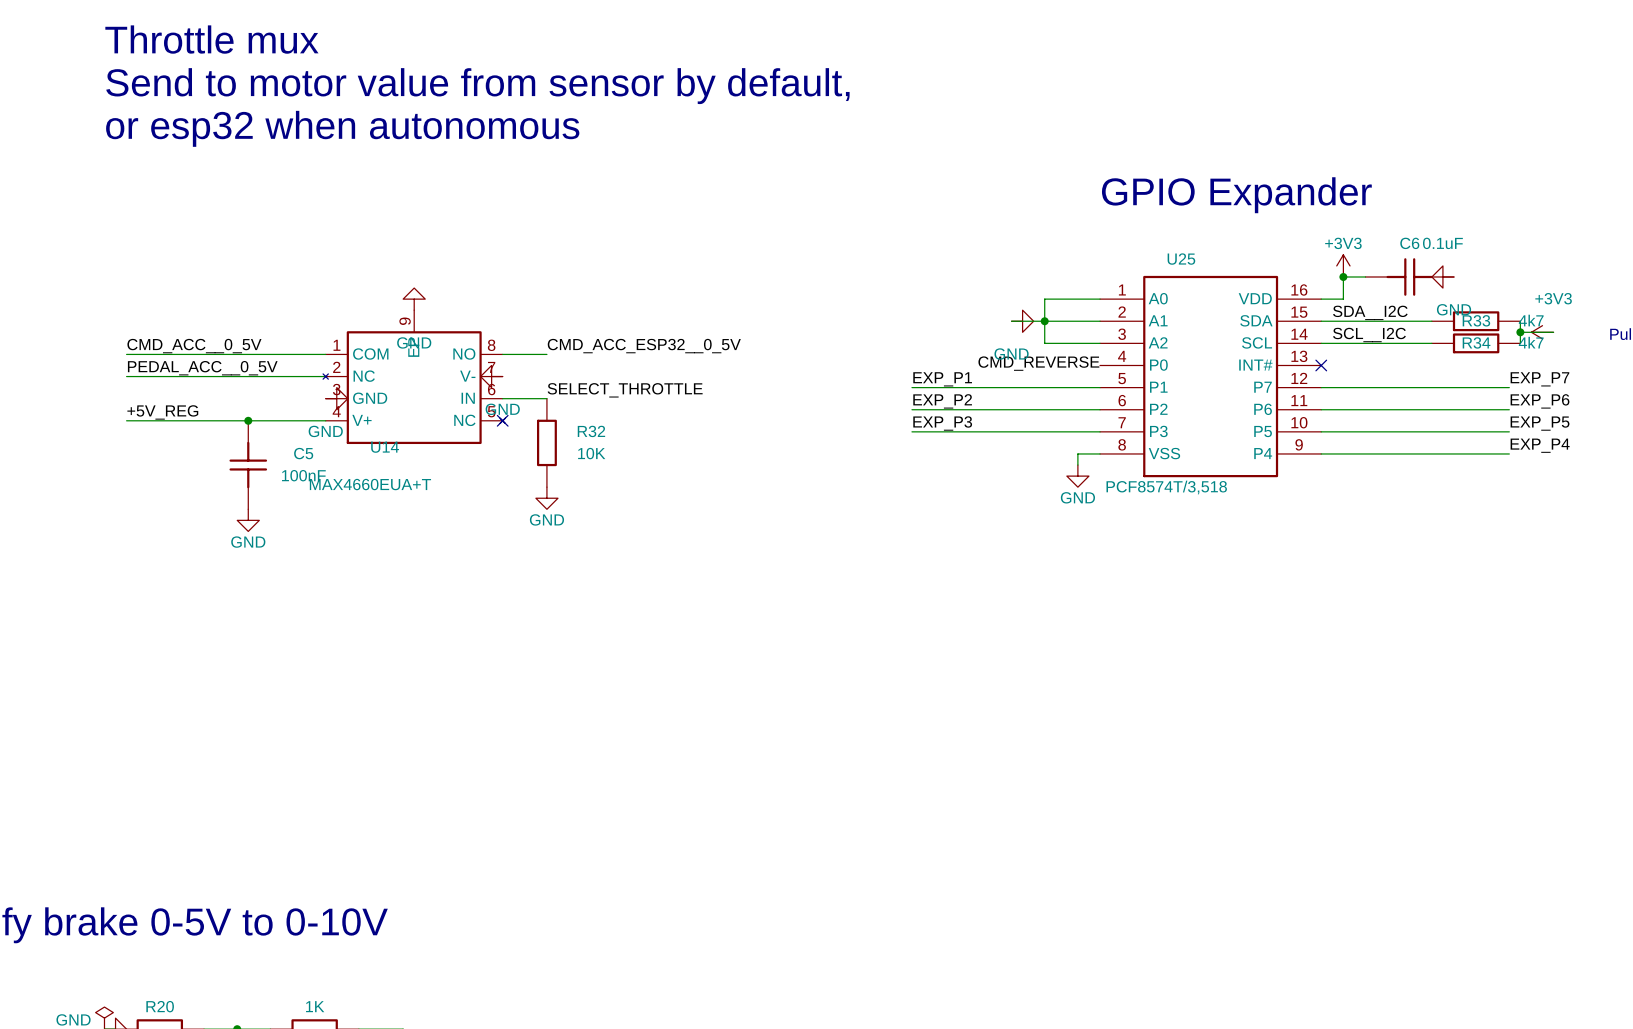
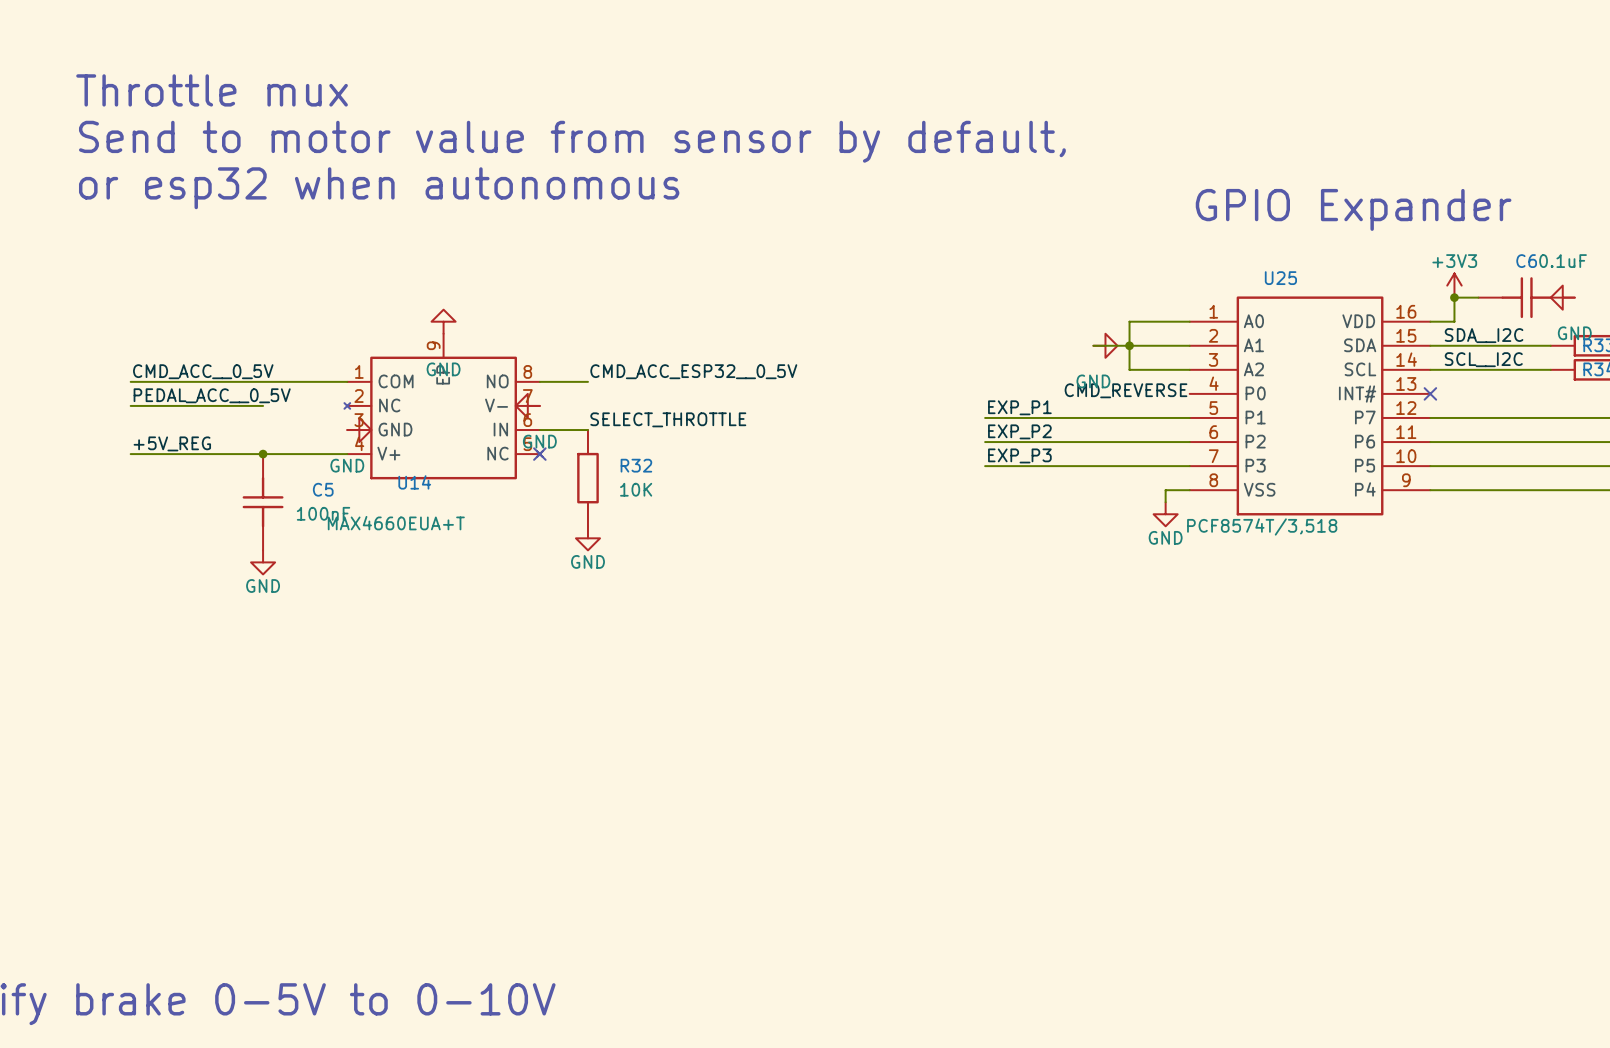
text position: Throttle mux (211, 39) -> Throttle mux (212, 90)
text position: Send to motor value from sensor by default, (477, 86) -> Send to motor value from sensor by default, (572, 141)
text position: or esp32 when autonomous (342, 128) -> or esp32 when autonomous (379, 188)
wire: (248, 376) (325, 376) -> none

